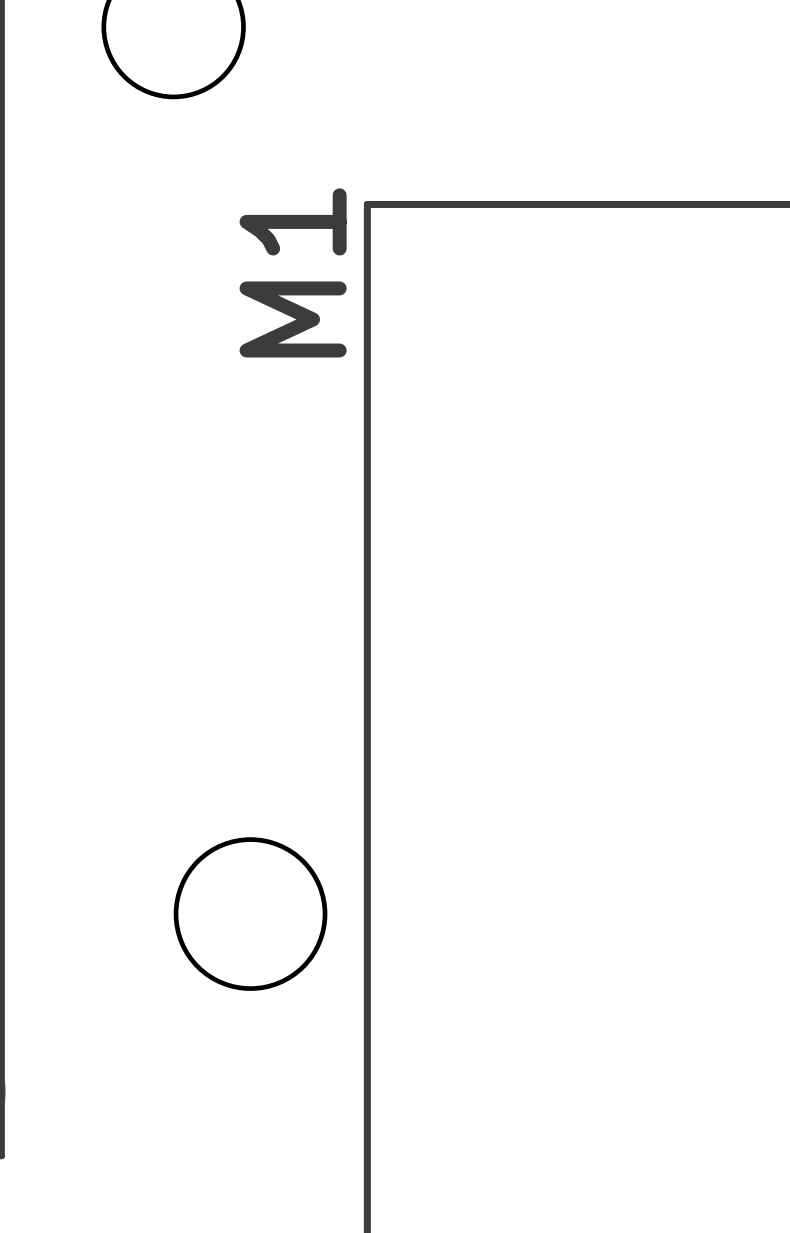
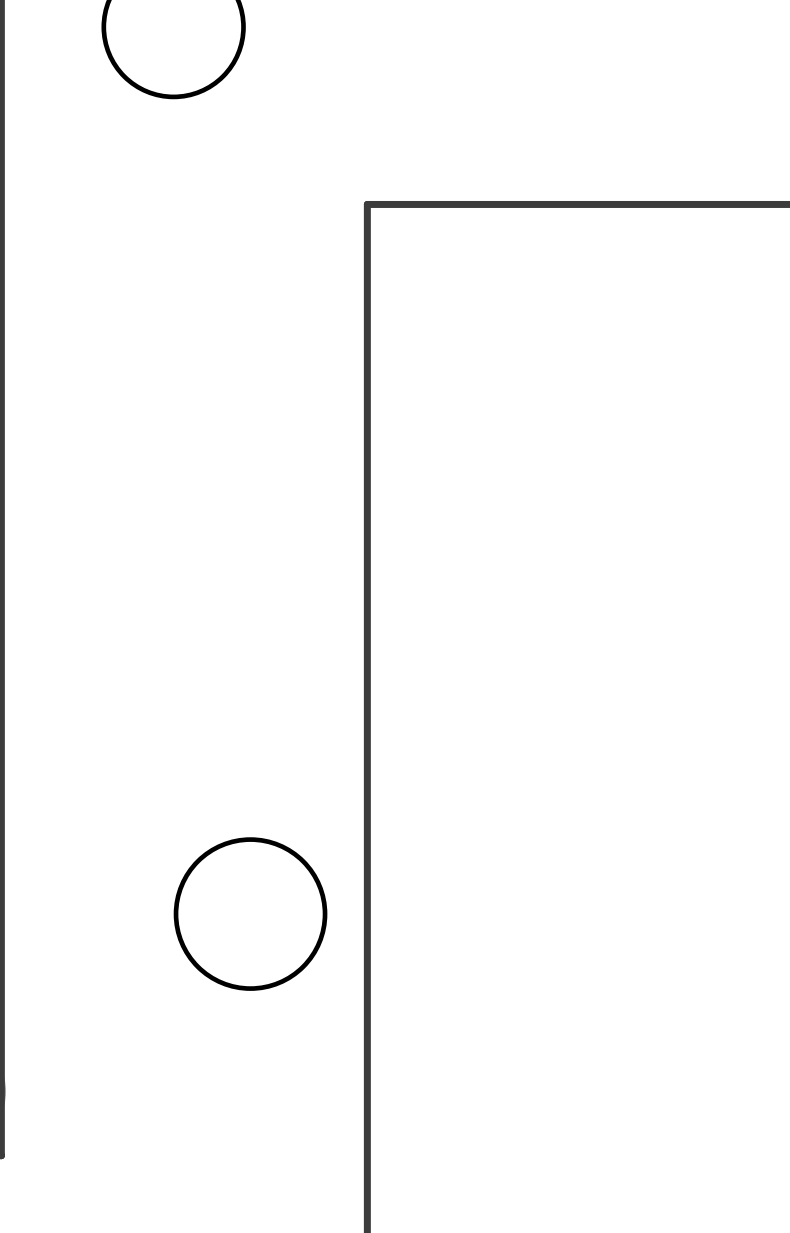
text: M1 (293, 272) -> none

